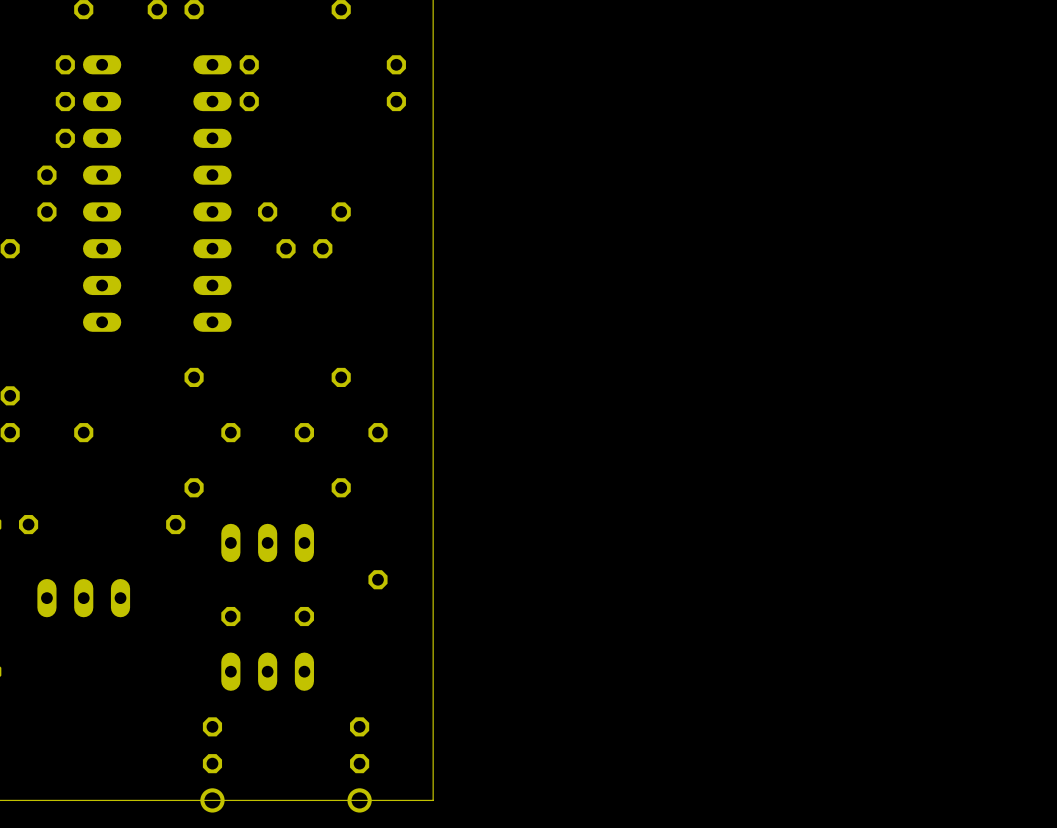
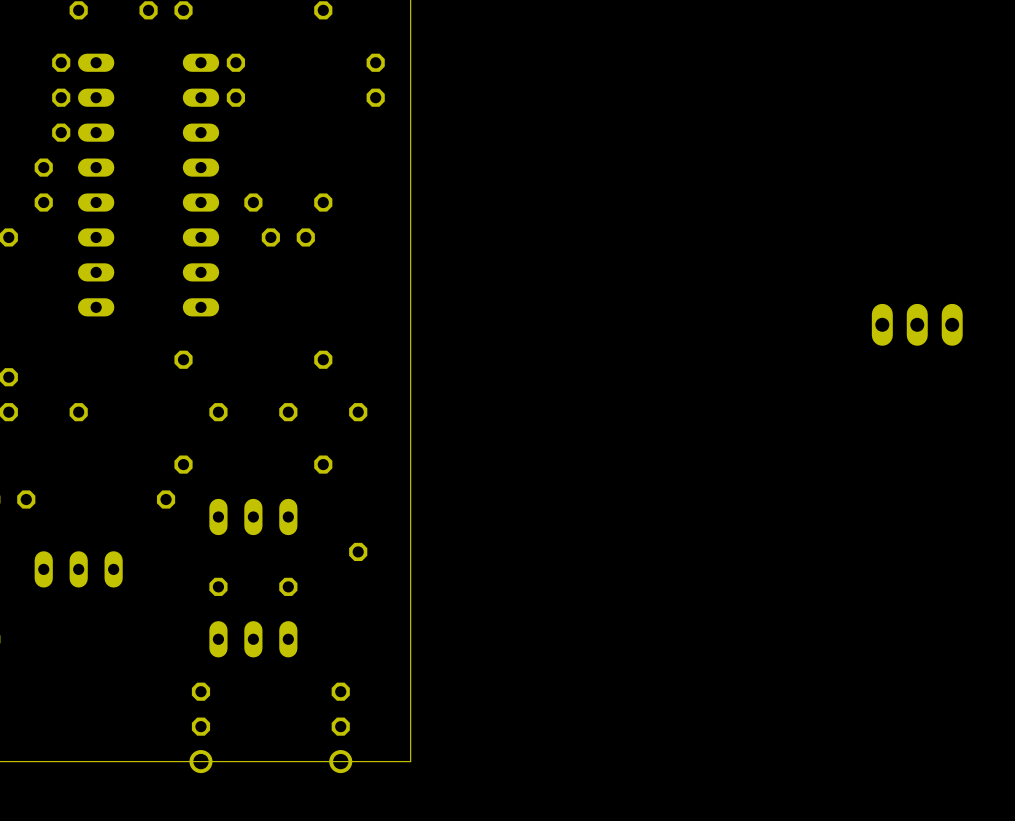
part: none -> (917, 324)

